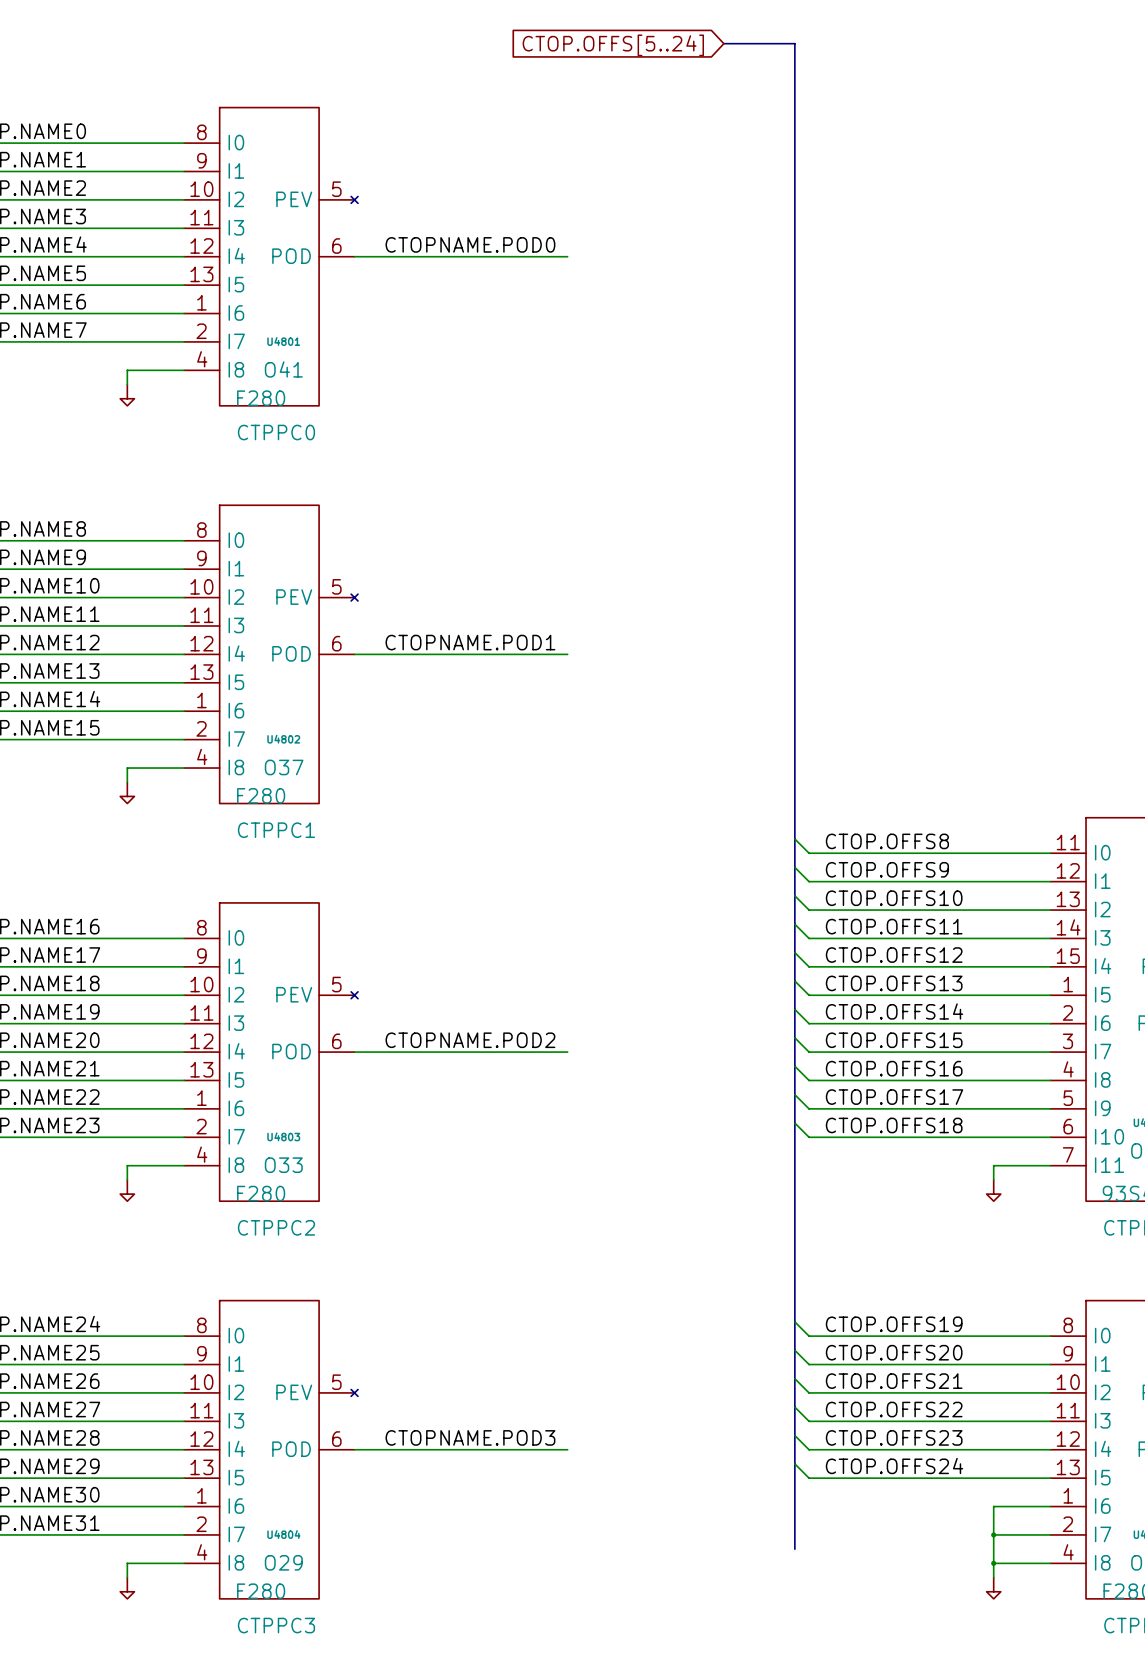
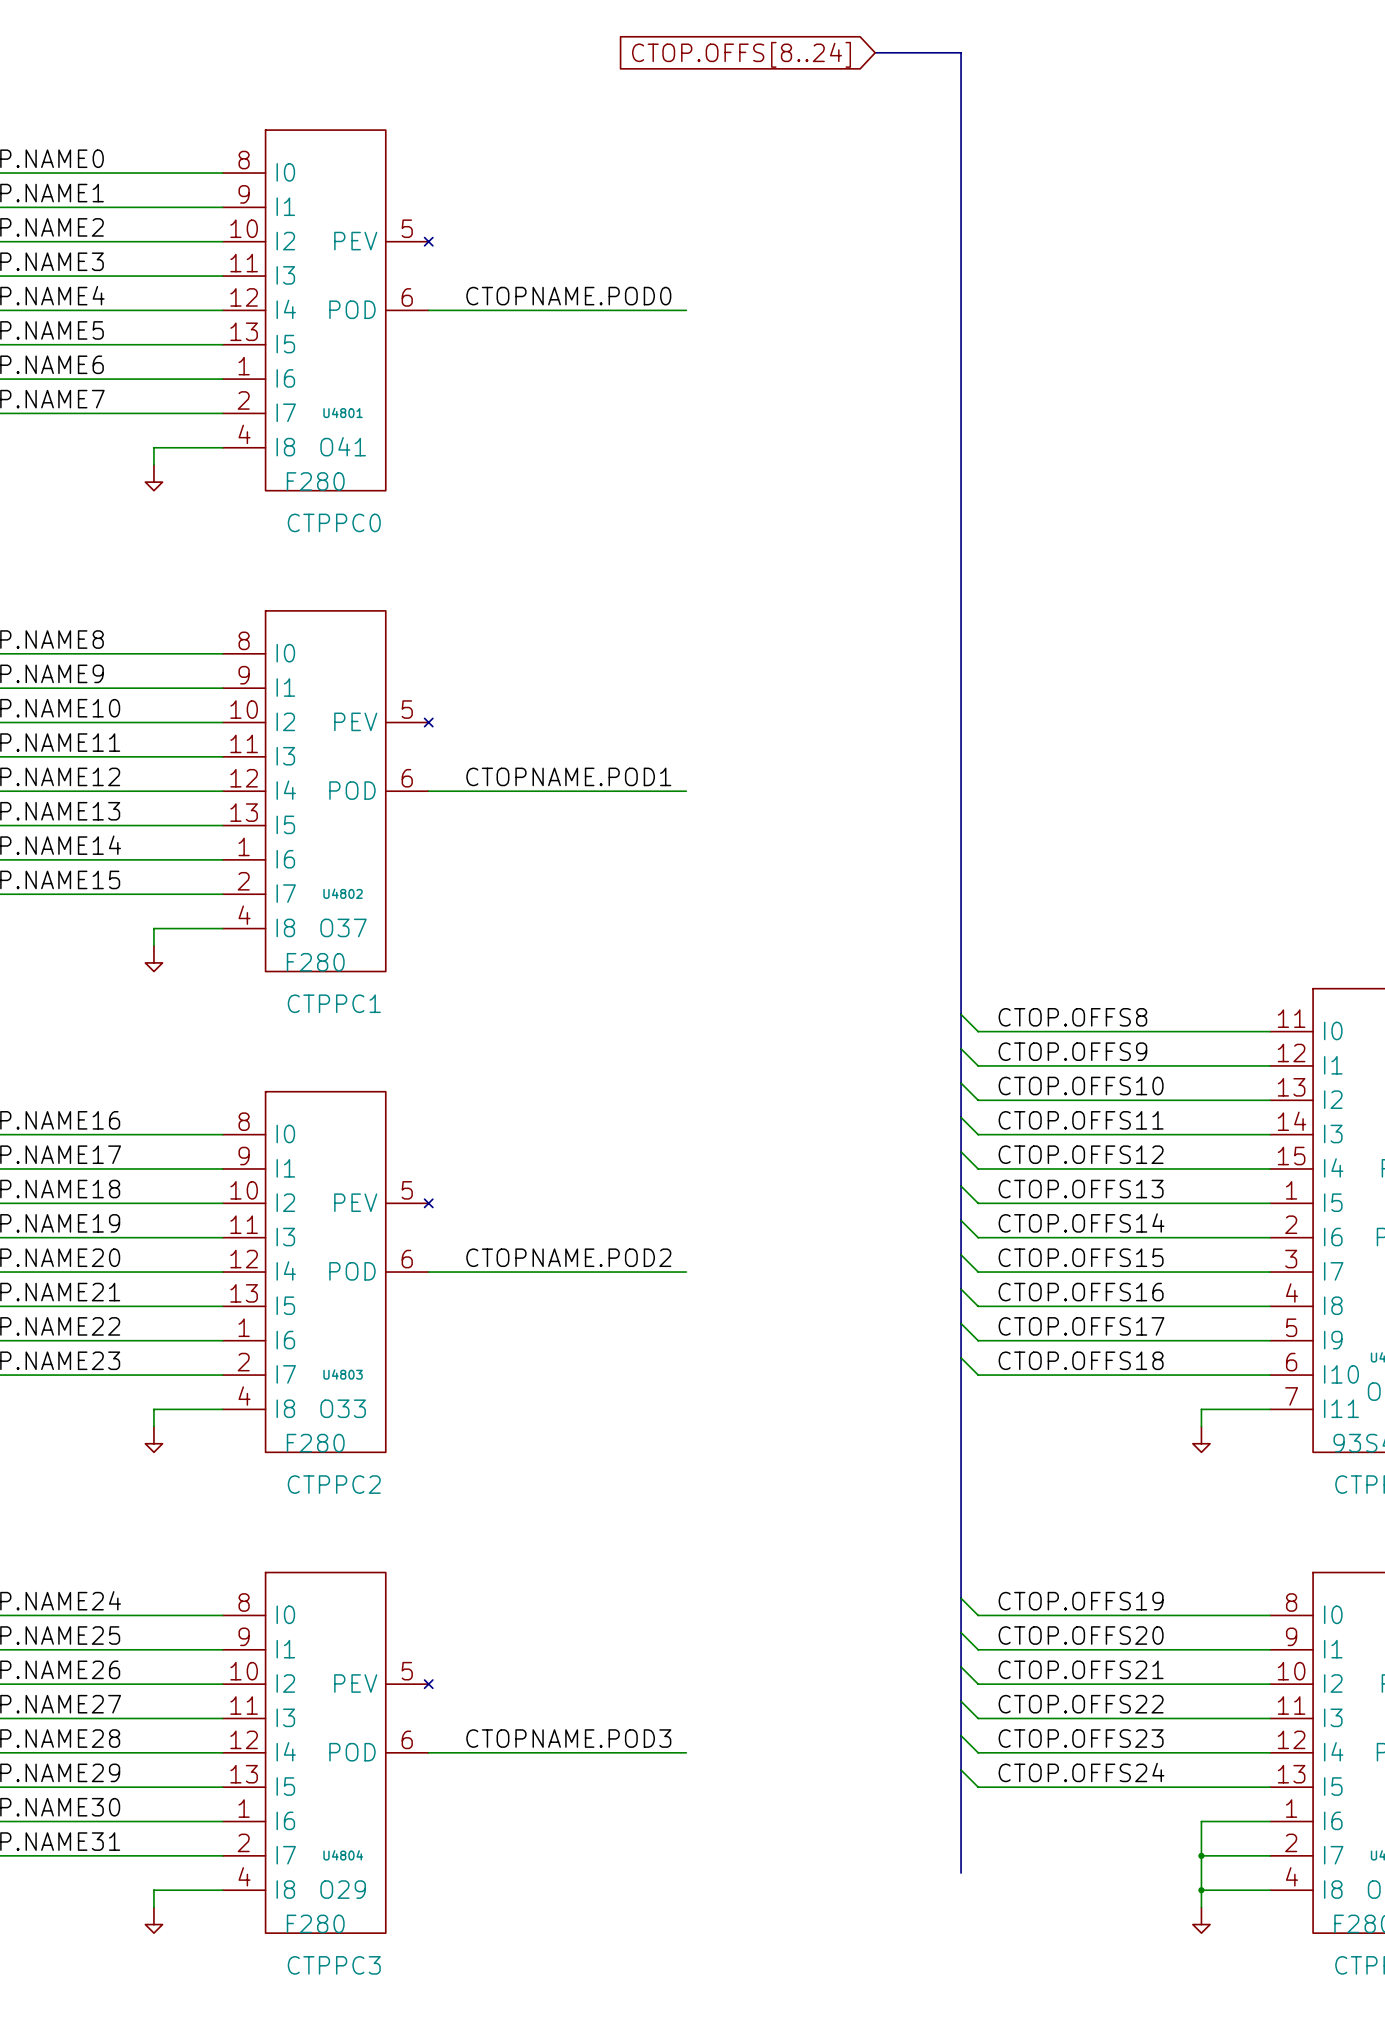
global label: CTOP.OFFS[5..24] (613, 45) -> CTOP.OFFS[8..24] (741, 54)

